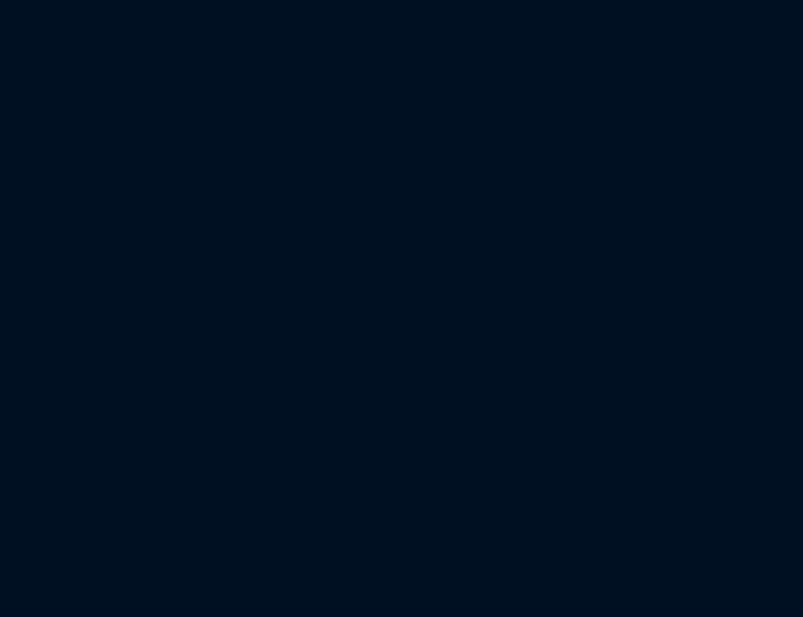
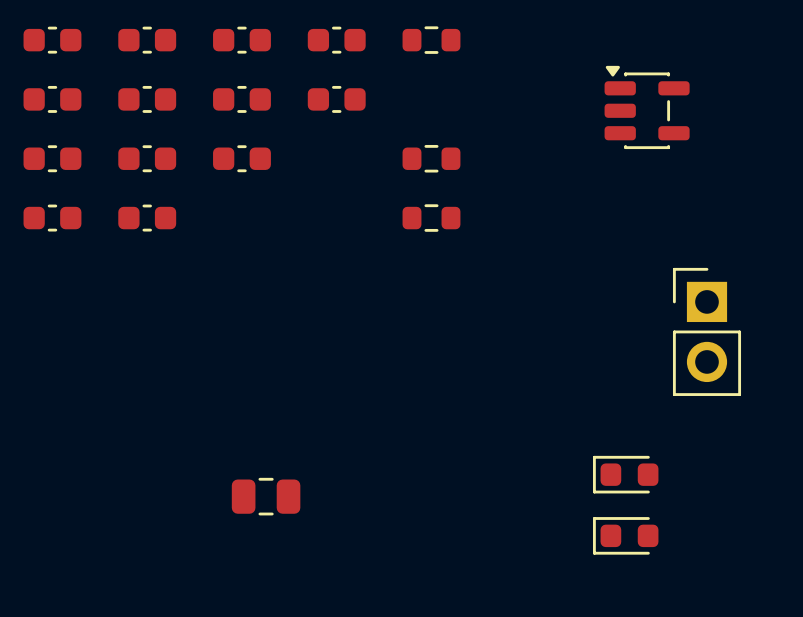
part: none -> (52, 40)
part: none -> (147, 40)
part: none -> (241, 40)
part: none -> (336, 40)
part: none -> (431, 40)
part: none -> (52, 99)
part: none -> (147, 99)
part: none -> (241, 99)
part: none -> (336, 99)
part: none -> (647, 107)
part: none -> (52, 158)
part: none -> (147, 158)
part: none -> (241, 158)
part: none -> (431, 158)
part: none -> (52, 218)
part: none -> (147, 218)
part: none -> (431, 218)
part: none -> (707, 331)
part: none -> (625, 474)
part: none -> (266, 496)
part: none -> (625, 535)

